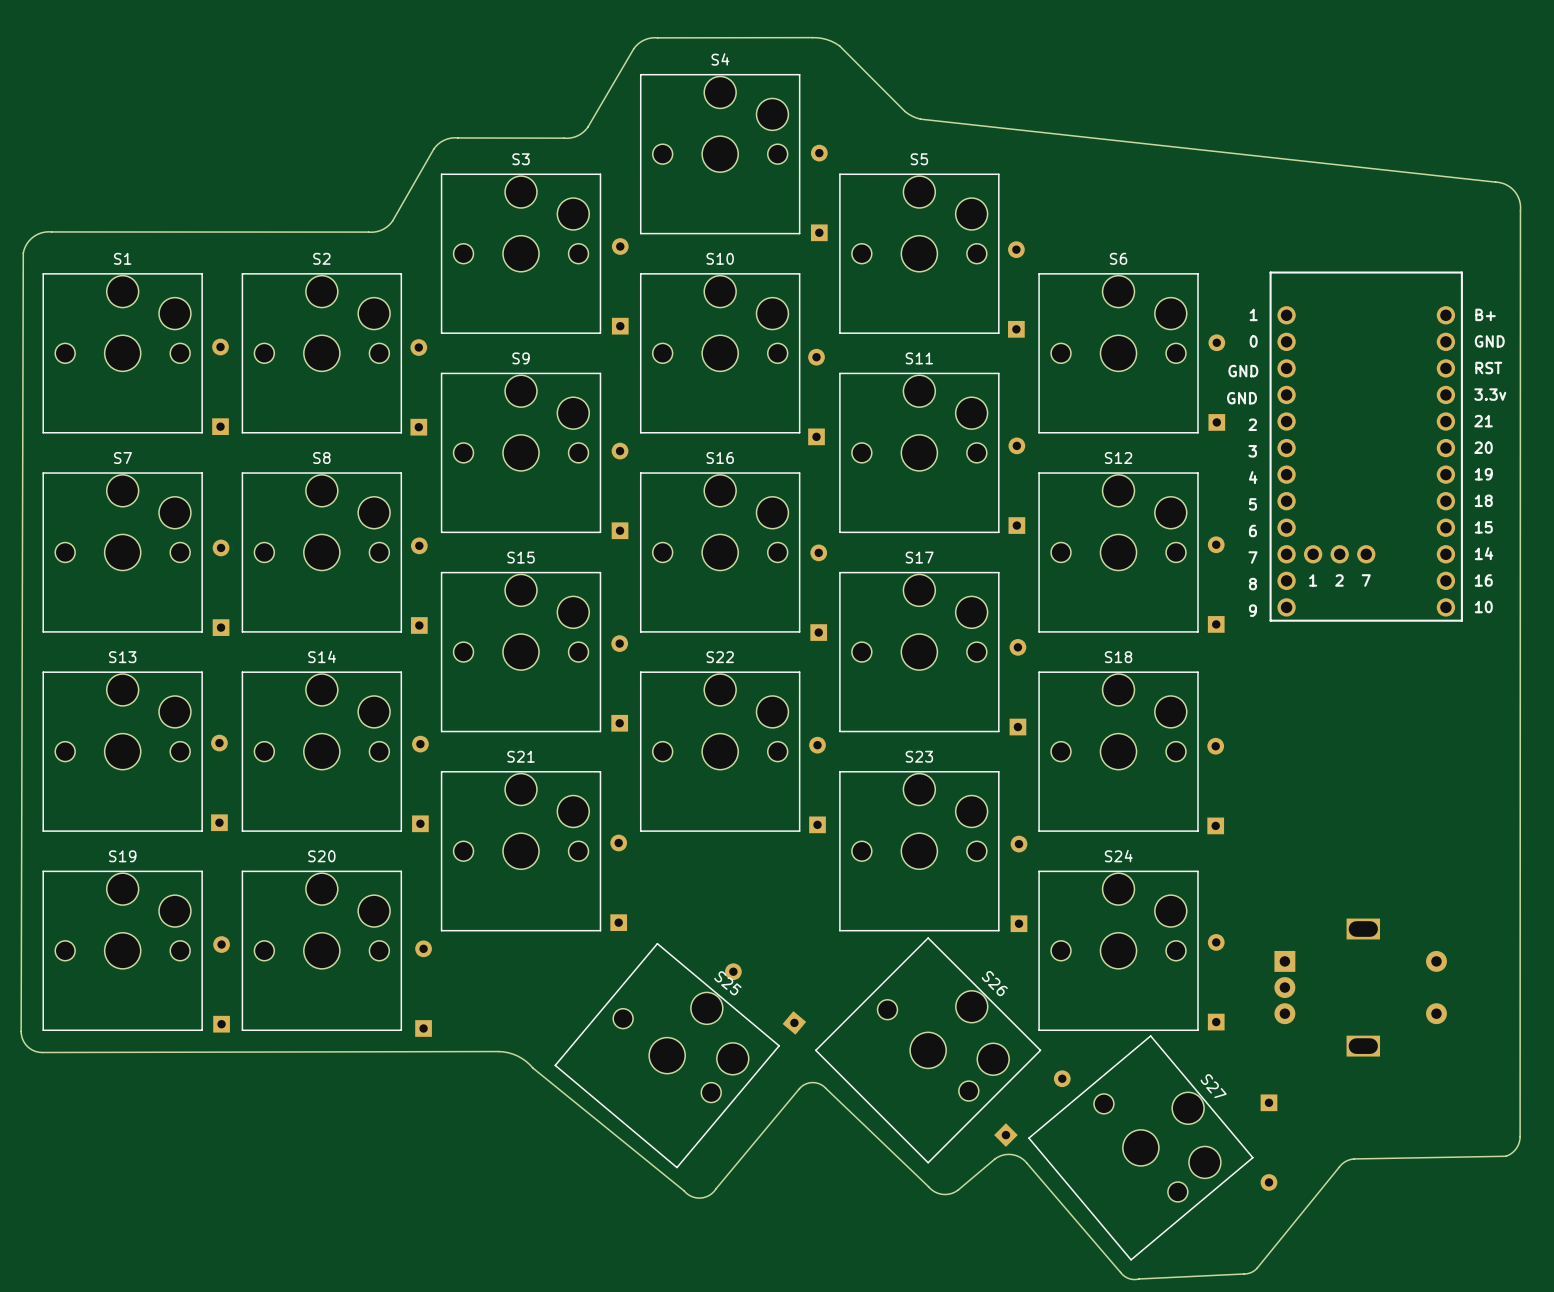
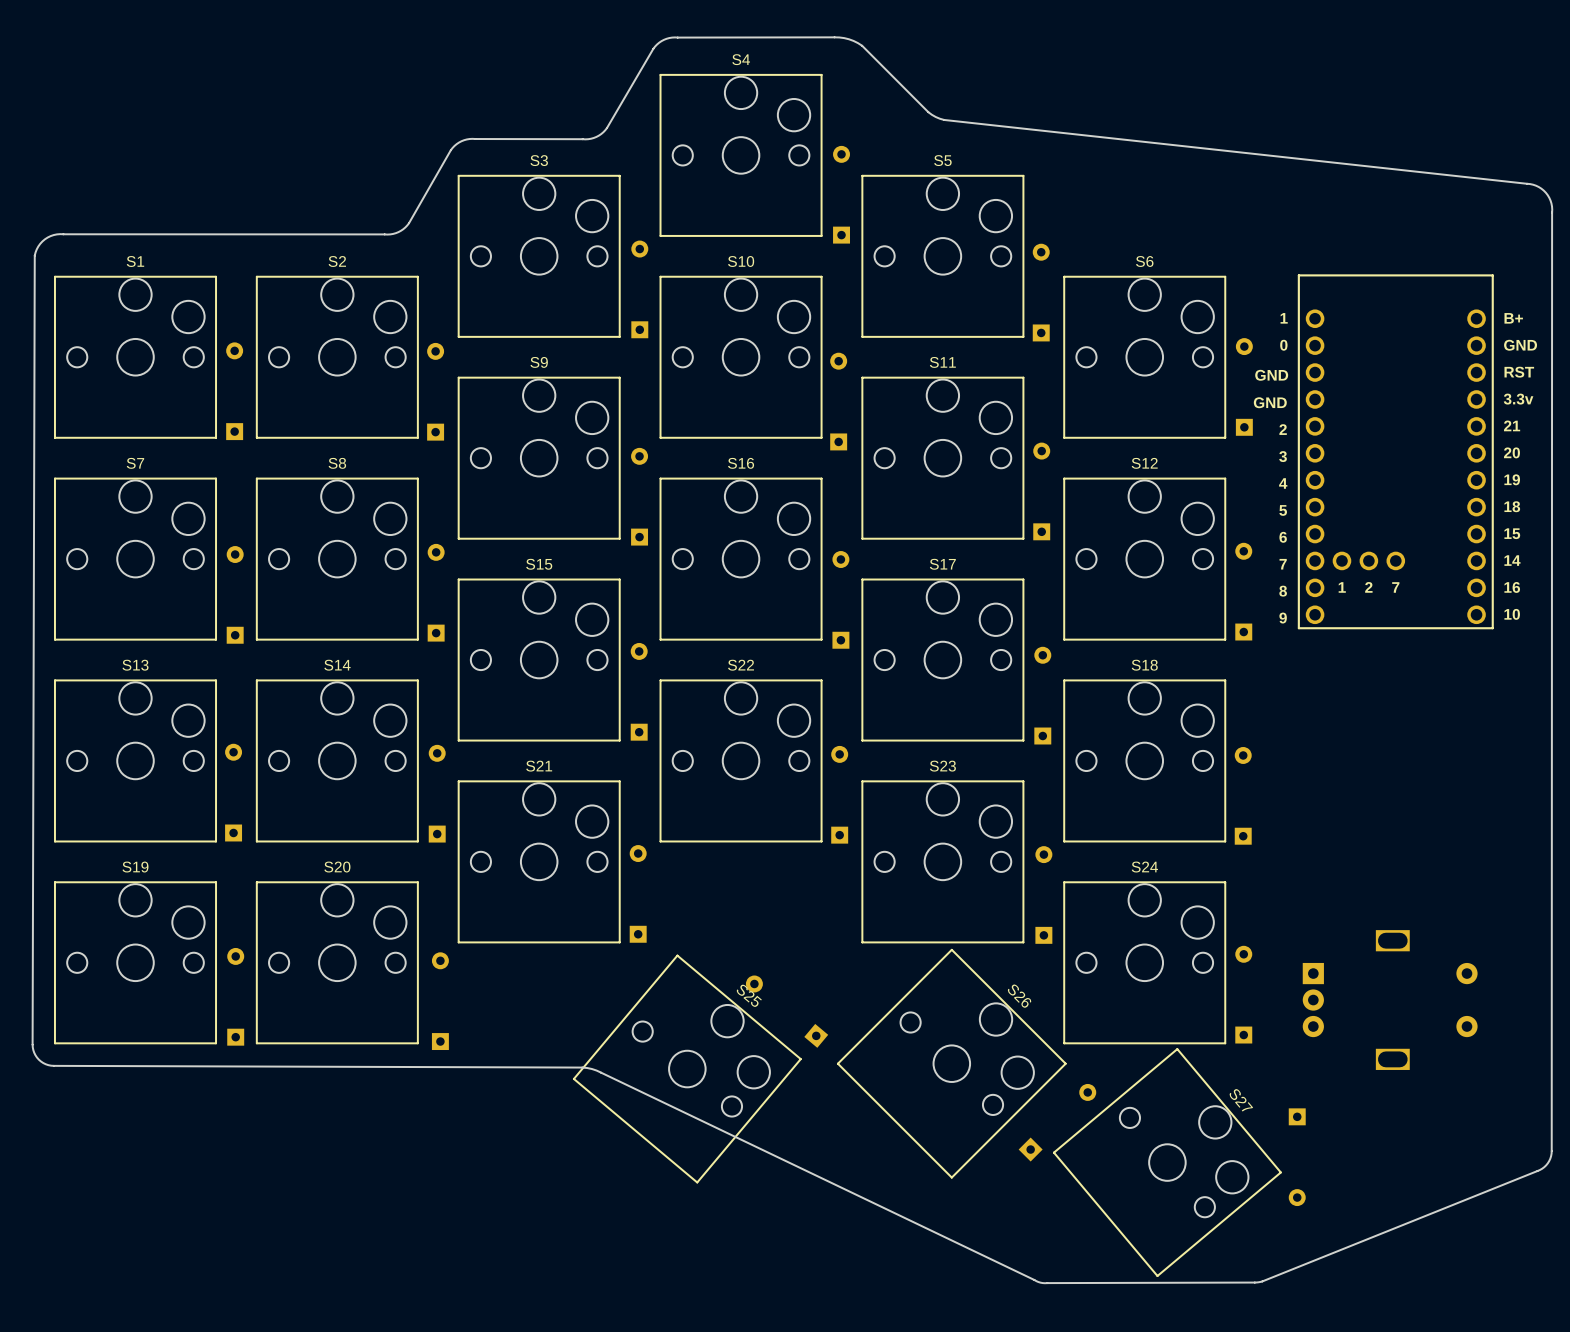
board edge: (42, 1052) (508, 1052) (525, 1061) (687, 1194) (698, 1198) (707, 1196) (713, 1192) (800, 1087) (808, 1083) (816, 1083) (824, 1086) (930, 1188) (937, 1193) (945, 1194) (956, 1191) (999, 1156) (1011, 1154) (1020, 1157) (1121, 1274) (1132, 1279) (1246, 1273) (1253, 1271) (1340, 1165) (1349, 1159) (1506, 1156) -> (53, 1065) (592, 1069) (1042, 1283) (1260, 1281) (1537, 1171)

